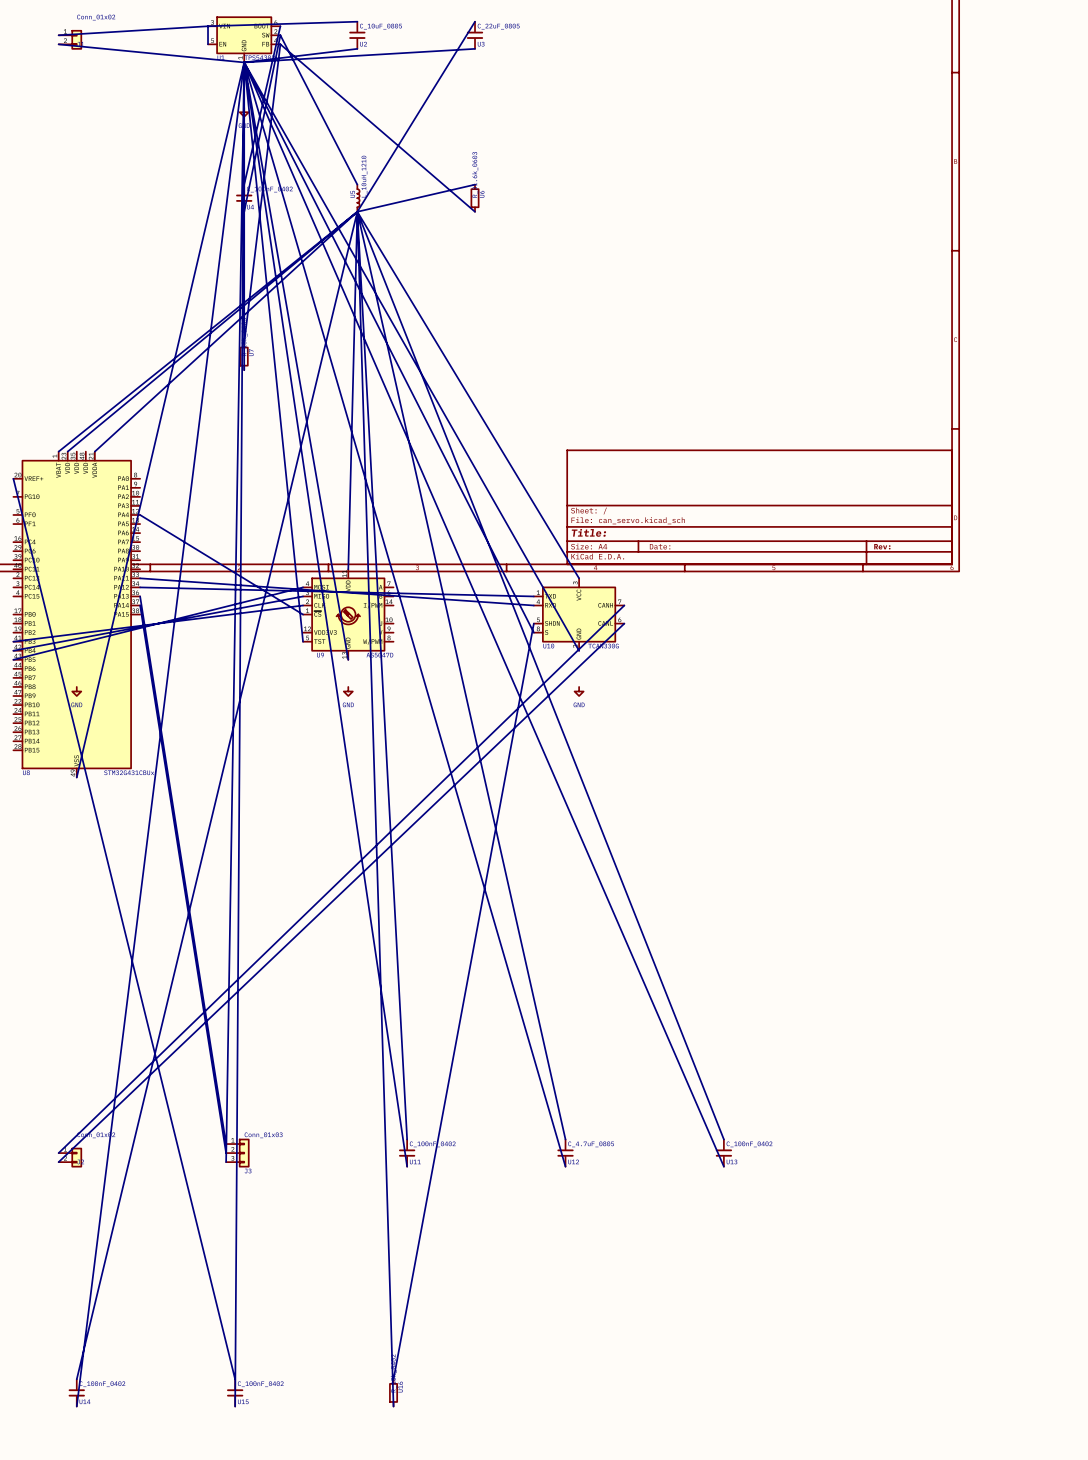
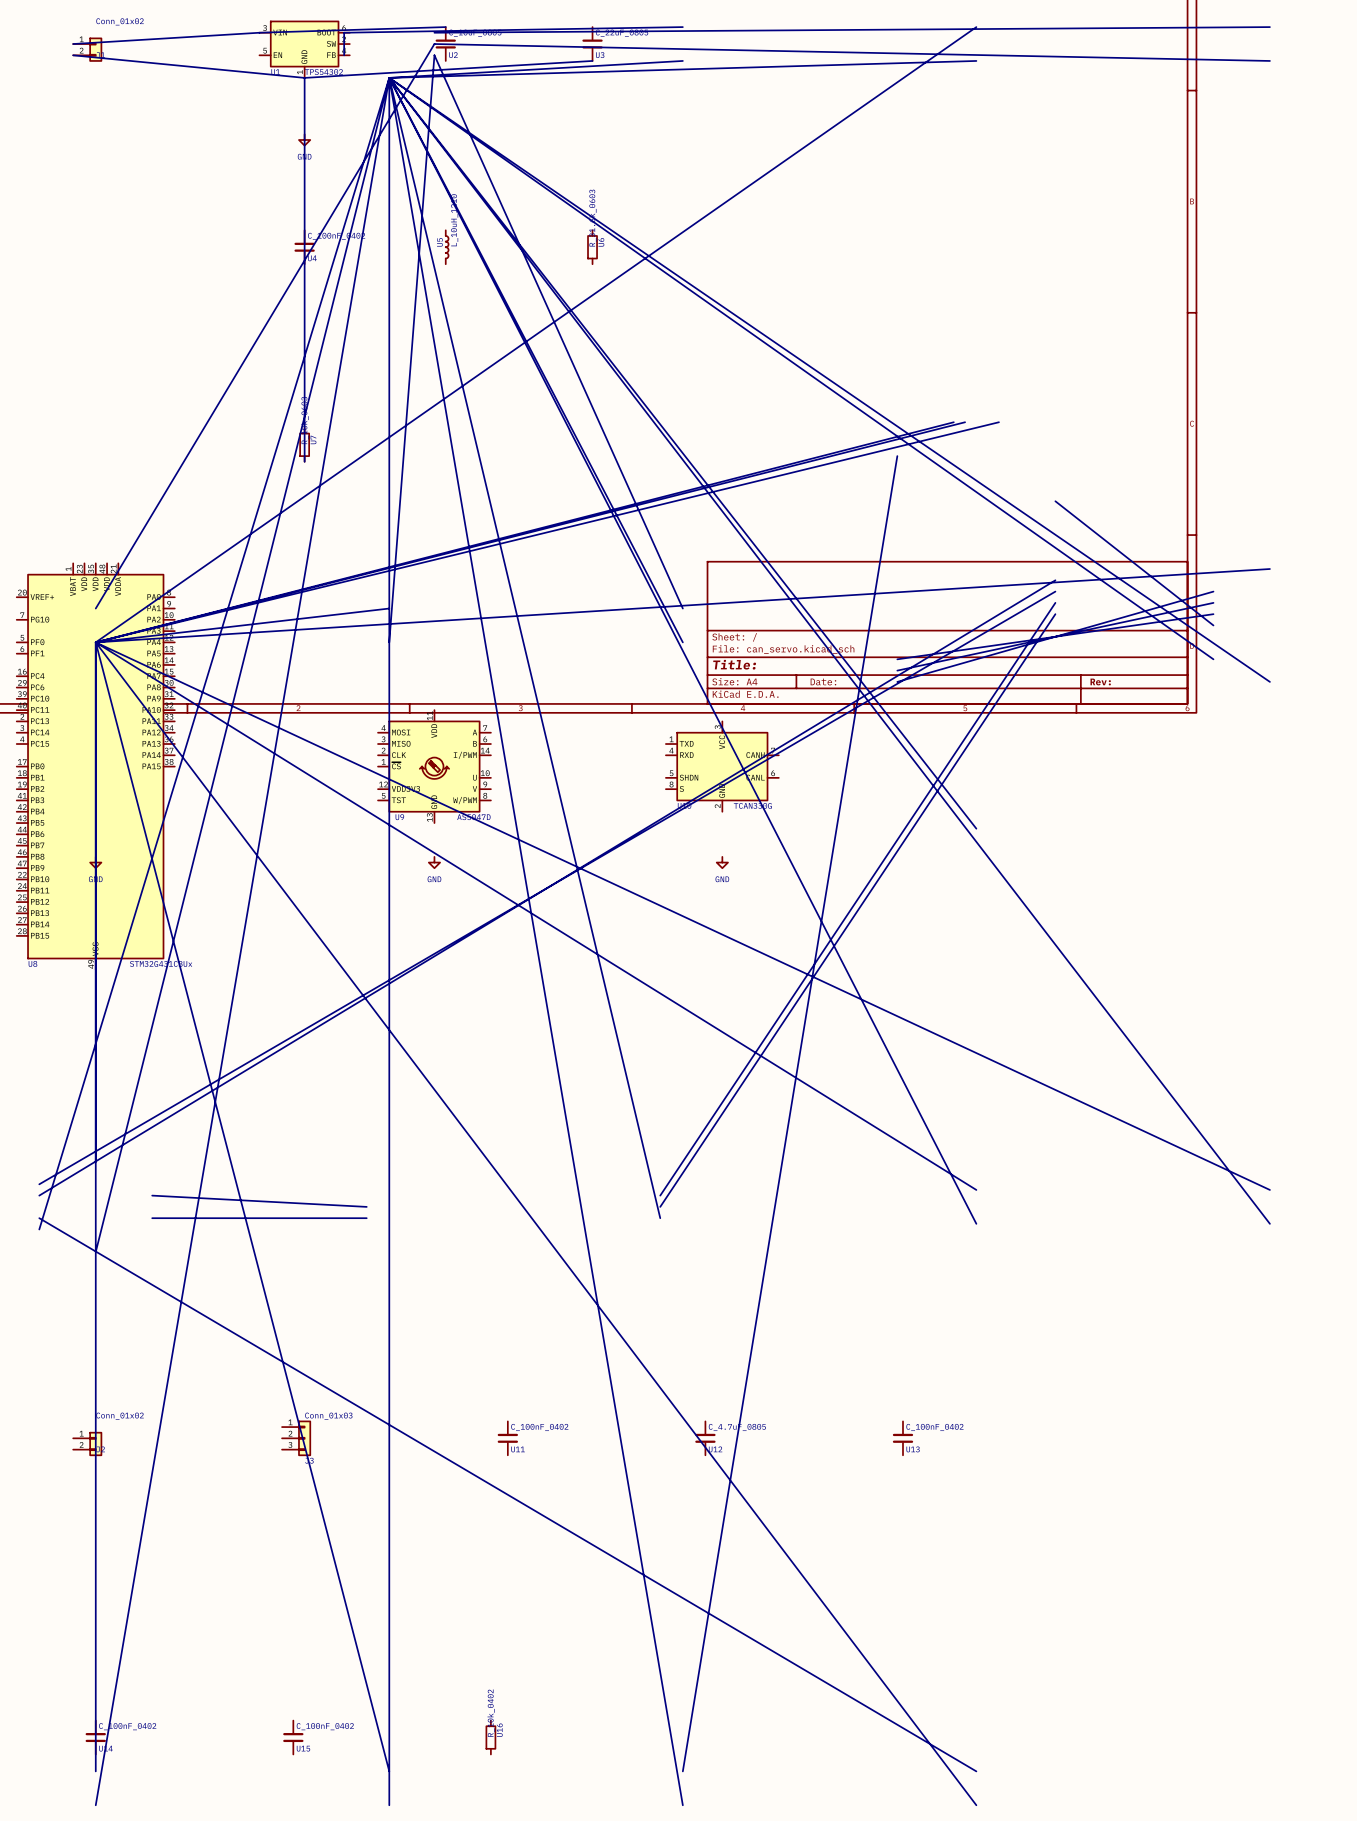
wire: (475, 21) (357, 211) -> none
wire: none -> (682, 27) (344, 32) (344, 55)
wire: none -> (976, 27) (95, 642)
wire: none -> (1269, 27) (434, 32)
wire: (208, 26) (208, 44) -> none
wire: (280, 26) (244, 184) -> none
wire: (357, 48) (244, 62) -> none
wire: none -> (682, 60) (389, 77)
wire: none -> (976, 60) (389, 77)
wire: none -> (1269, 60) (434, 44) (95, 608)
wire: (244, 62) (76, 777) -> none
wire: (244, 62) (407, 1166) -> none
wire: (244, 62) (565, 1166) -> none
wire: (244, 62) (723, 1166) -> none
wire: (244, 62) (76, 1406) -> none
wire: (244, 62) (579, 650) -> none
wire: (244, 62) (348, 659) -> none
wire: (244, 62) (235, 1406) -> none
wire: (244, 62) (303, 641) -> none
wire: (244, 62) (533, 632) -> none
wire: (244, 62) (226, 1162) -> none
wire: none -> (389, 77) (682, 642)
wire: none -> (389, 77) (976, 828)
wire: none -> (389, 77) (976, 1223)
wire: none -> (389, 77) (1269, 1223)
wire: none -> (389, 77) (389, 1805)
wire: none -> (389, 77) (1269, 681)
wire: none -> (389, 77) (682, 1805)
wire: none -> (389, 77) (1213, 659)
wire: none -> (389, 77) (660, 1218)
wire: none -> (389, 77) (95, 1805)
wire: none -> (389, 77) (95, 1252)
wire: none -> (389, 77) (39, 1229)
wire: (357, 184) (280, 35) (244, 211) -> none
wire: (475, 184) (357, 211) -> none
wire: (357, 211) (67, 451) -> none
wire: (357, 211) (94, 451) -> none
wire: (357, 211) (58, 451) -> none
wire: (357, 211) (407, 1139) -> none
wire: (357, 211) (565, 1139) -> none
wire: (357, 211) (723, 1139) -> none
wire: (357, 211) (579, 578) -> none
wire: (357, 211) (76, 1379) -> none
wire: (357, 211) (348, 569) -> none
wire: (357, 211) (393, 1406) -> none
wire: (475, 211) (280, 44) (244, 343) -> none
wire: none -> (953, 422) (95, 642)
wire: none -> (965, 422) (95, 642)
wire: none -> (998, 422) (95, 642)
wire: none -> (897, 456) (682, 1771)
wire: none -> (1055, 501) (1213, 625)
wire: none -> (1269, 569) (95, 642)
wire: none -> (1055, 580) (39, 1195)
wire: none -> (1055, 591) (39, 1184)
wire: none -> (1213, 591) (897, 681)
wire: (13, 478) (235, 1379) -> none
wire: none -> (1055, 602) (660, 1195)
wire: none -> (1213, 602) (897, 670)
wire: none -> (389, 608) (95, 642)
wire: none -> (682, 608) (434, 55) (389, 642)
wire: none -> (1055, 614) (660, 1206)
wire: none -> (1213, 614) (897, 659)
wire: none -> (95, 642) (976, 1189)
wire: none -> (95, 642) (1269, 1189)
wire: none -> (95, 642) (95, 1771)
wire: none -> (95, 642) (389, 1771)
wire: none -> (95, 642) (976, 1805)
wire: (140, 514) (303, 614) -> none
wire: (140, 578) (533, 605) -> none
wire: (140, 587) (533, 596) -> none
wire: (303, 587) (13, 659) -> none
wire: (140, 596) (226, 1144) -> none
wire: (303, 596) (13, 650) -> none
wire: (140, 605) (226, 1153) -> none
wire: (303, 605) (13, 641) -> none
wire: (624, 605) (58, 1153) -> none
wire: (533, 623) (393, 1379) -> none
wire: (624, 623) (58, 1162) -> none
wire: none -> (152, 1195) (366, 1206)
wire: none -> (39, 1218) (976, 1771)
wire: none -> (152, 1218) (366, 1218)

